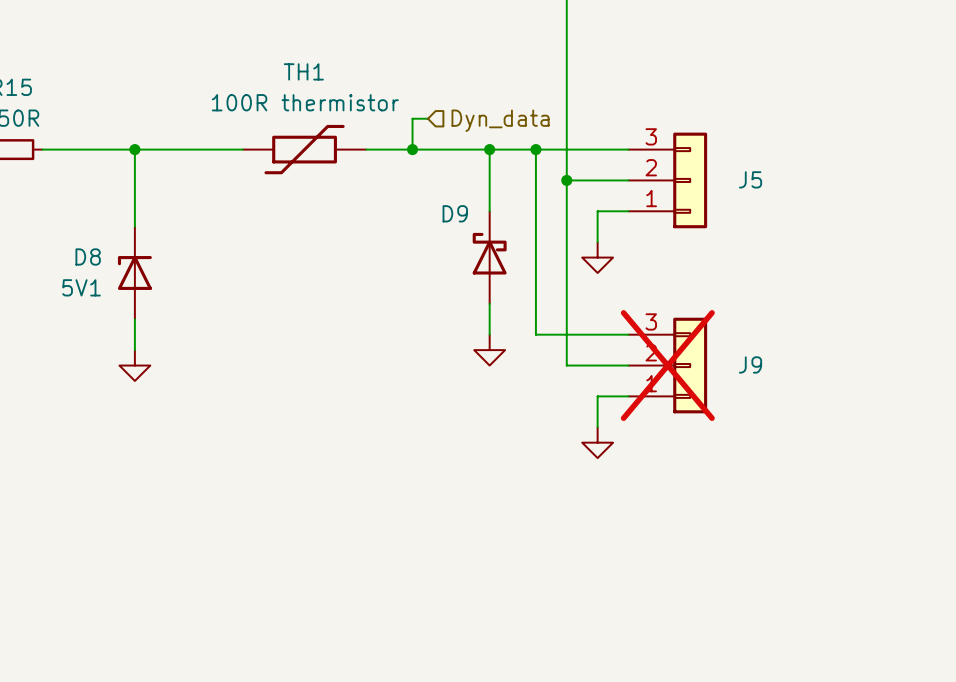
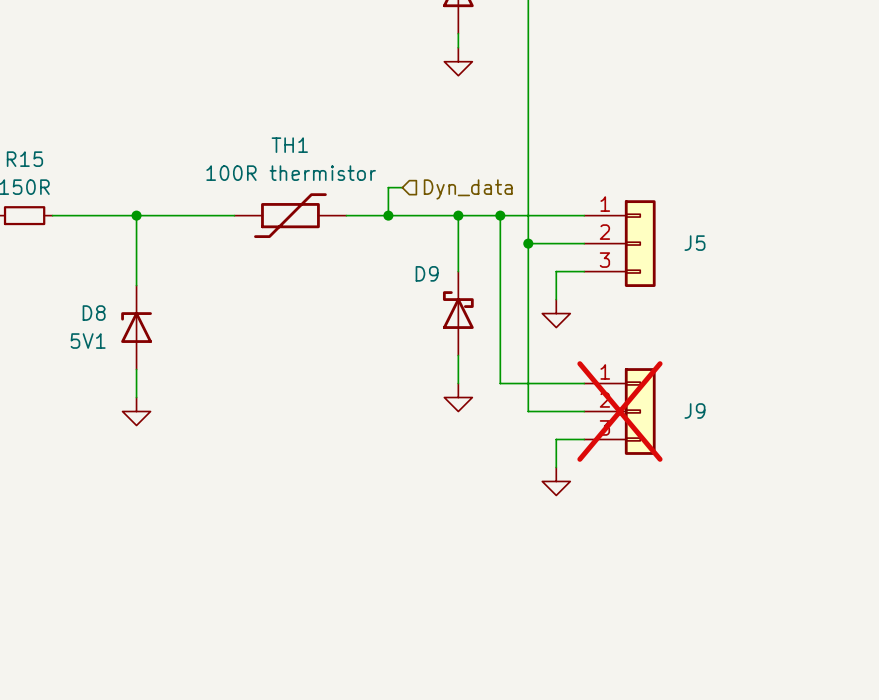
J5 flip: as is (690, 180) -> up-down (640, 243)
J9 flip: as is (690, 365) -> up-down (640, 411)

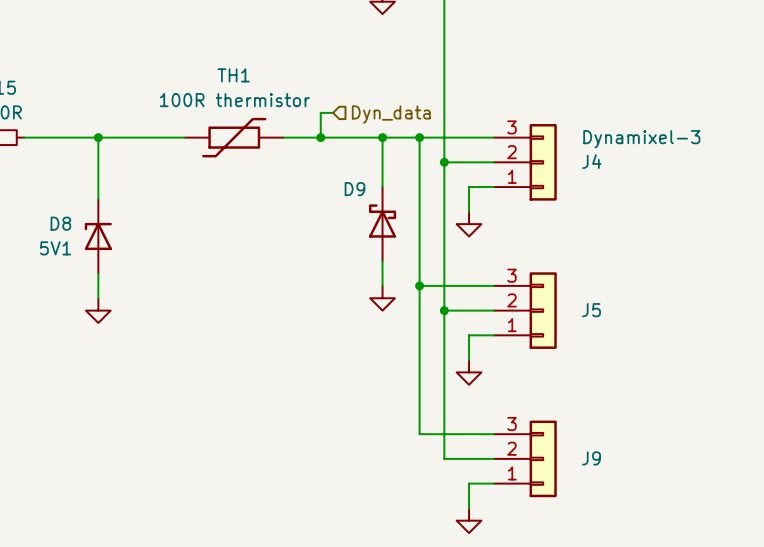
J5 position: (619, 243) -> (525, 310)
J4: none -> Dynamixel-3 (525, 162)
J5 flip: as is (640, 243) -> up-down (543, 310)
wire: none -> (419, 285) (419, 434) (493, 434)
junction: none -> (419, 285)
wire: none -> (444, 310) (444, 458) (493, 458)
junction: none -> (444, 310)
J9 position: (619, 411) -> (525, 458)
J9 do-not-place cross: (619, 411) -> none
J9 flip: as is (640, 411) -> up-down (543, 458)
wire: none -> (493, 483) (469, 483) (469, 508)
power symbol: none -> (469, 520)

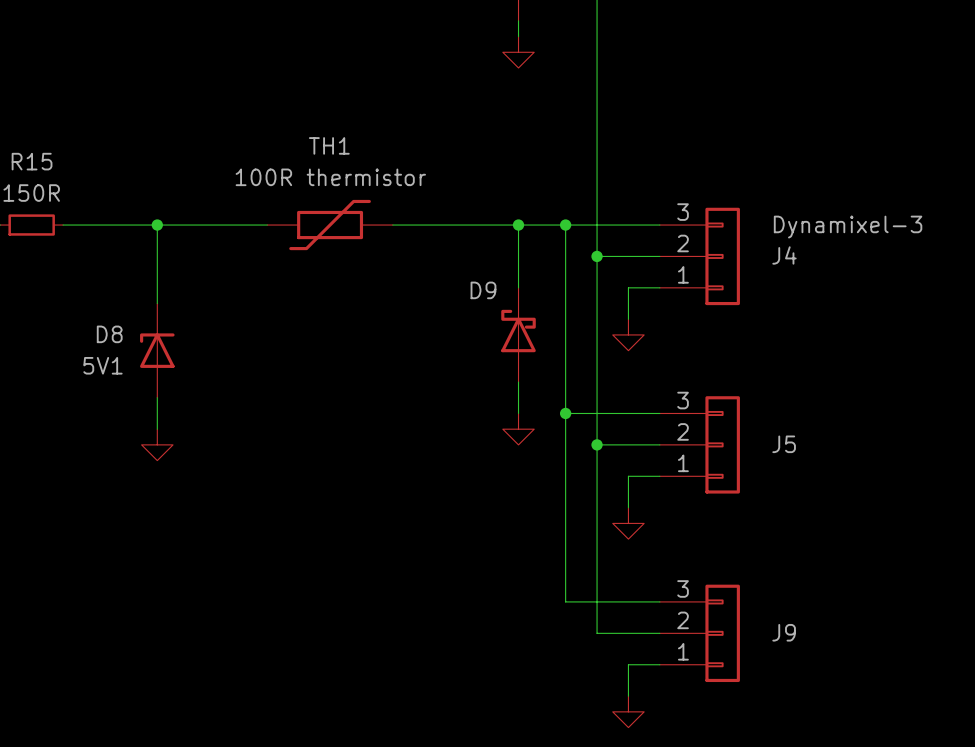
wire: (333, 112) (320, 112) (320, 137) -> none
hierarchical label: Dyn_data (391, 114) -> none
junction: (320, 137) -> none

